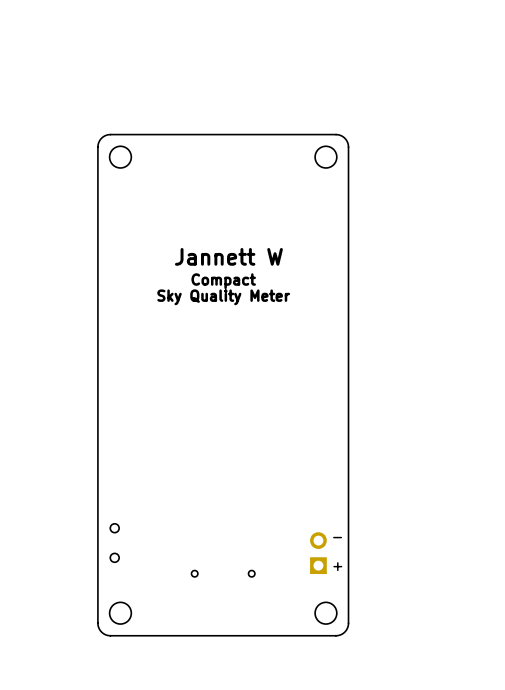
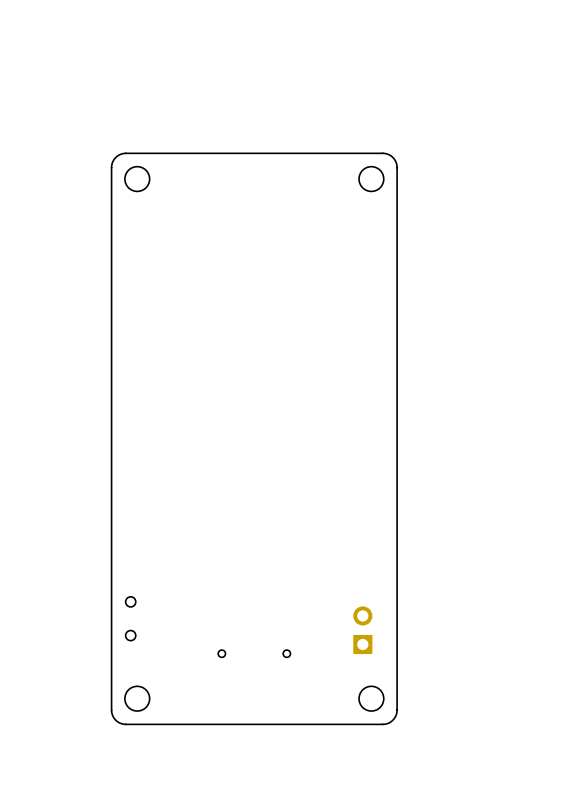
text: Jannett W (228, 256) -> none
text: Compact (223, 281) -> none
text: Sky Quality Meter (223, 297) -> none
text: - (337, 537) -> none
text: + (337, 566) -> none

